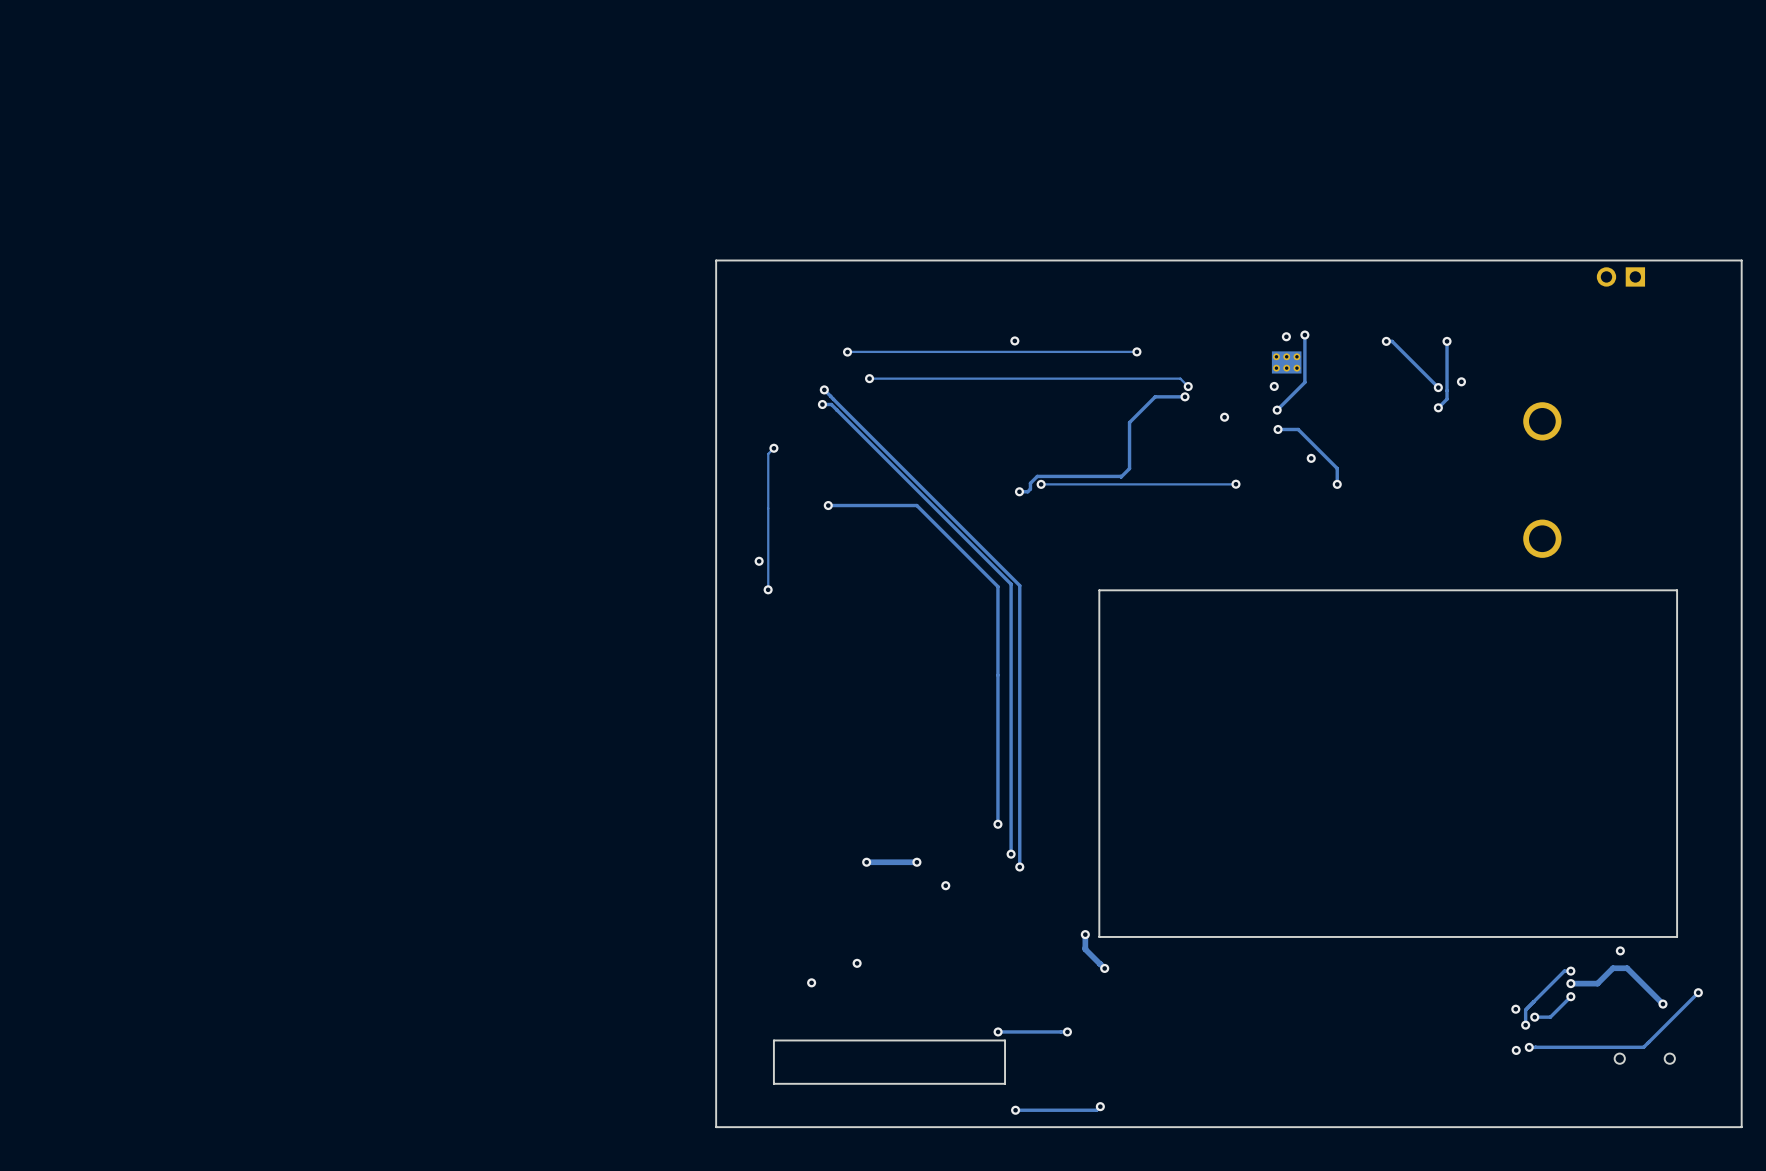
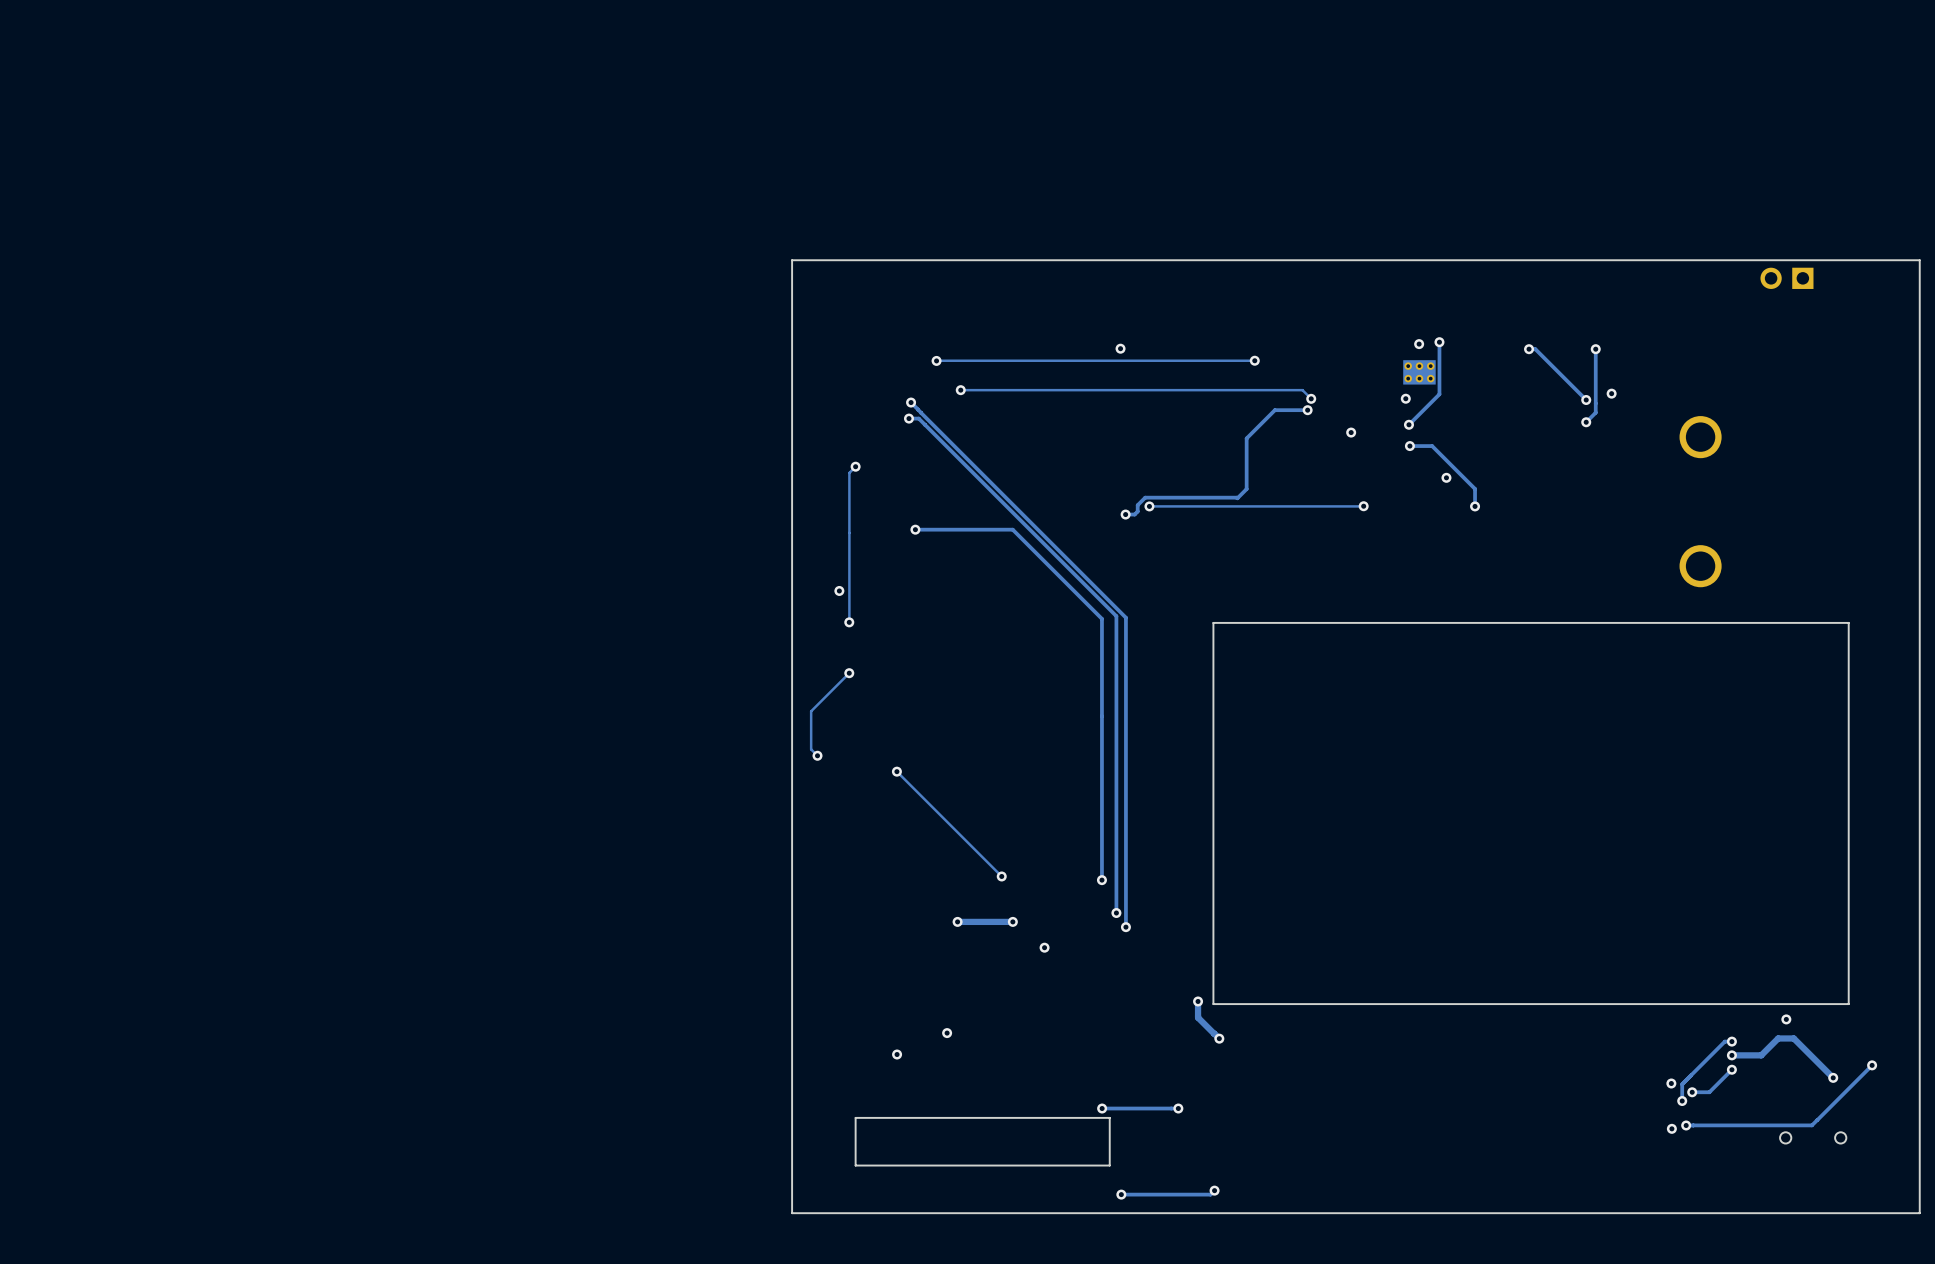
track: none -> (849, 673) (811, 711) (811, 749) (817, 755)
via: none -> (849, 673)
via: none -> (817, 755)
track: none -> (896, 771) (1001, 876)
via: none -> (896, 771)
via: none -> (1001, 876)

